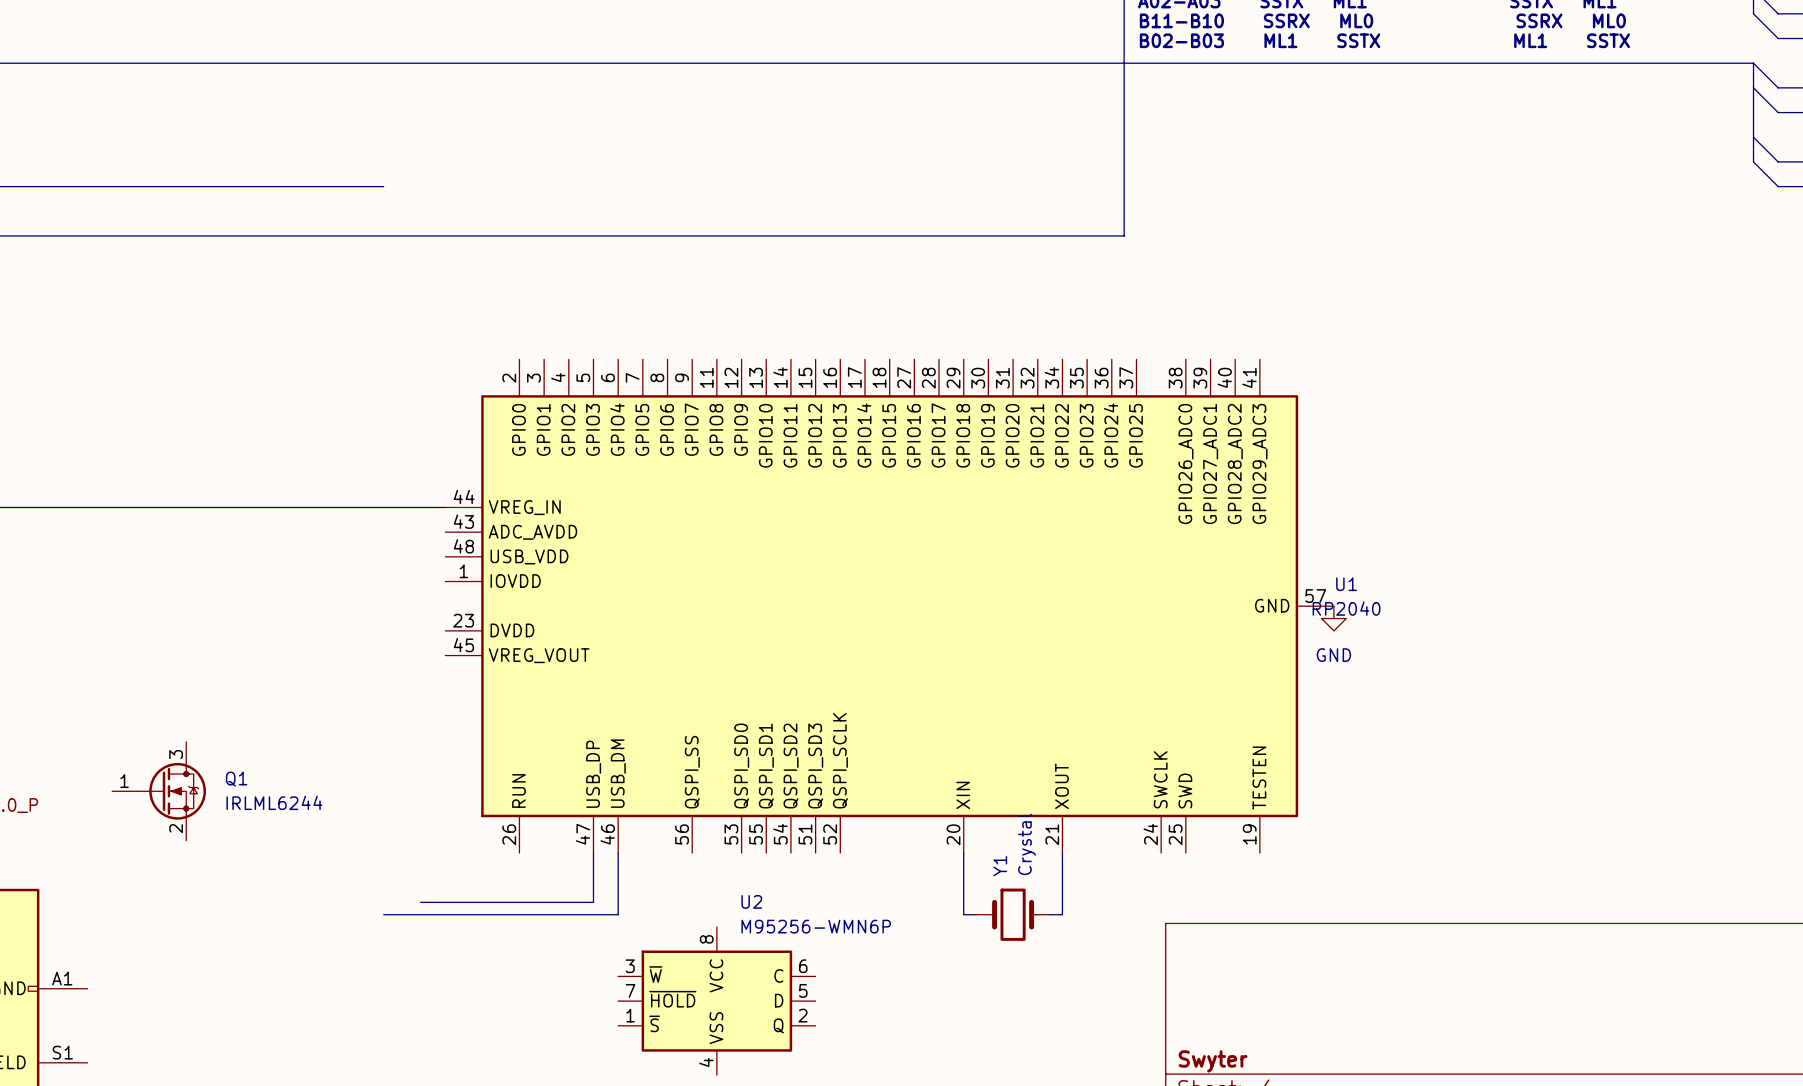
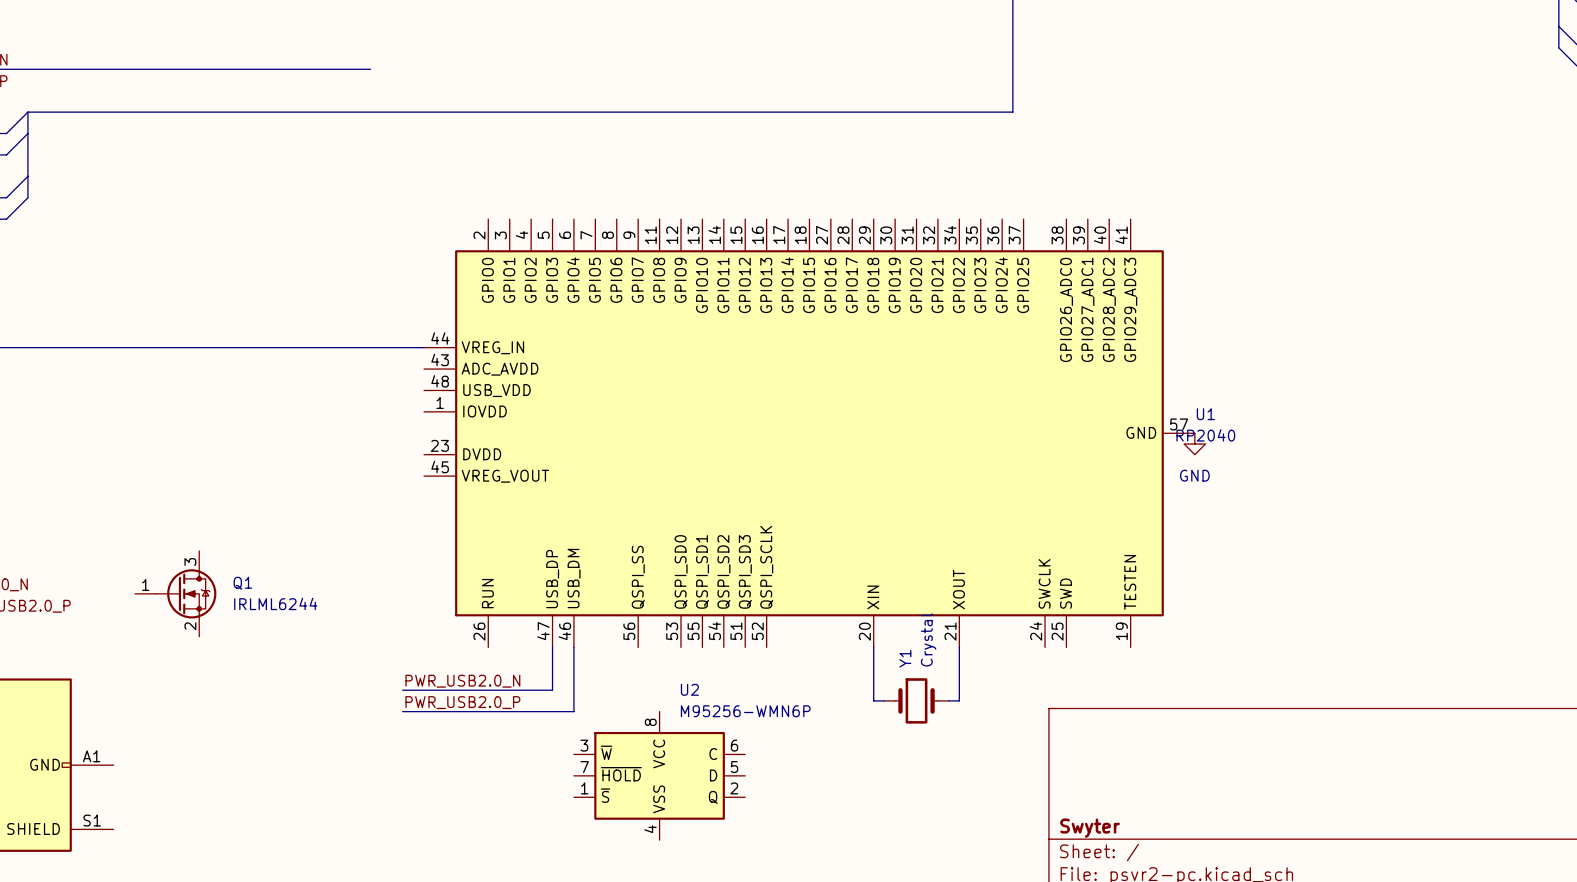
label: none -> PWR_USB2.0_N (462, 681)
wire: (383, 914) (618, 914) -> (402, 711) (573, 711) (573, 700)
label: none -> PWR_USB2.0_P (462, 702)

